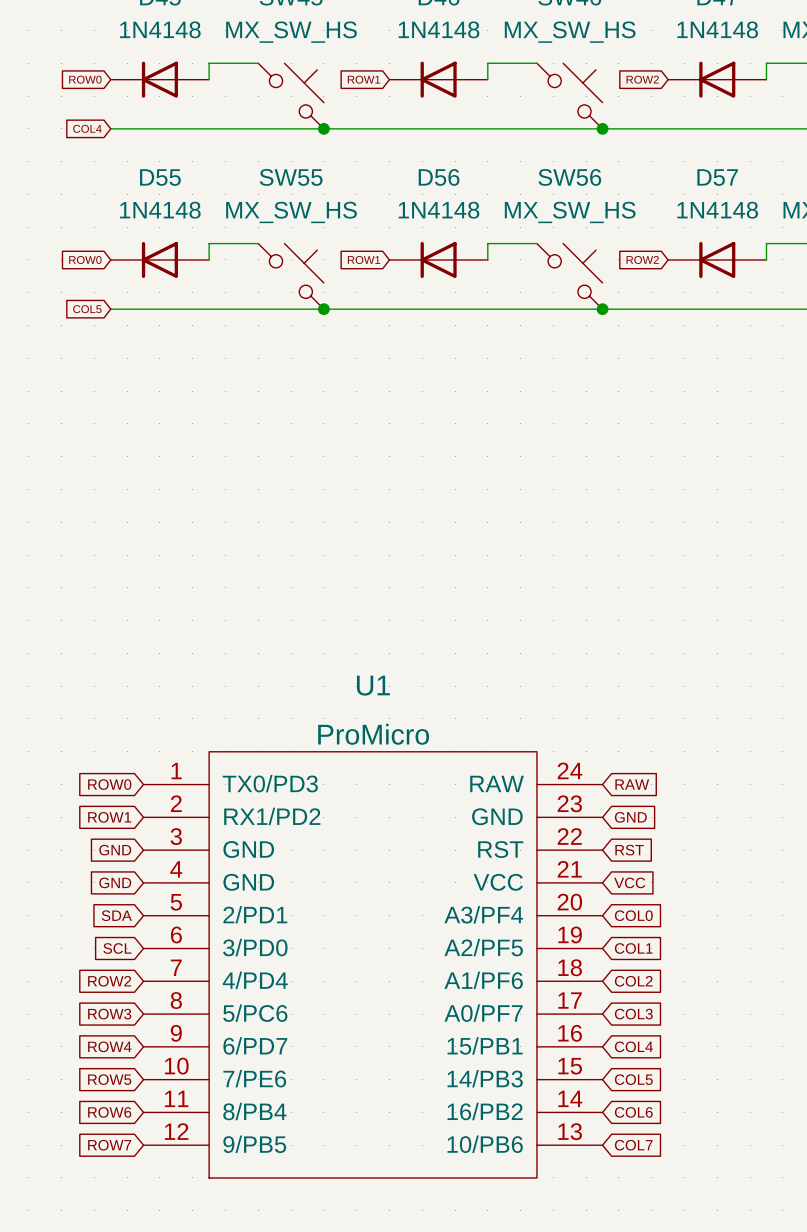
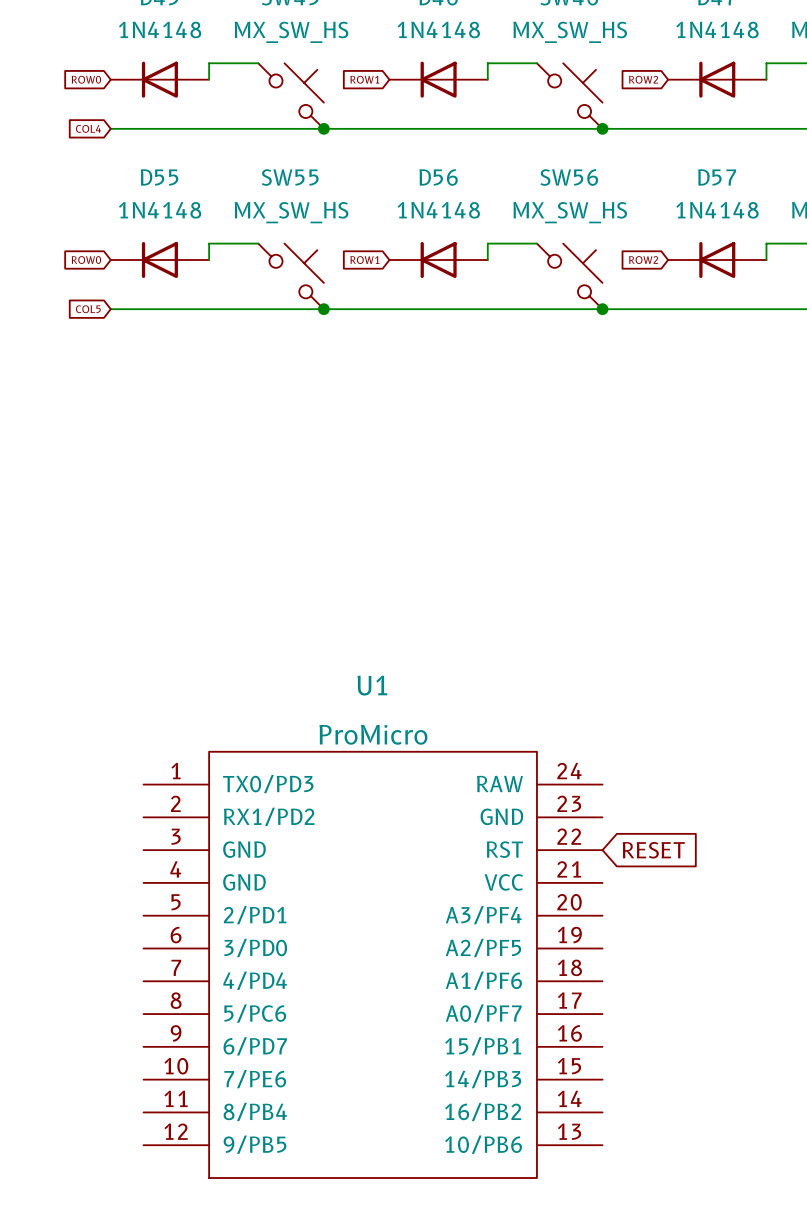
global label: ROW0 (109, 784) -> none
global label: RAW (632, 784) -> none
global label: ROW1 (109, 817) -> none
global label: GND (630, 817) -> none
global label: GND (115, 850) -> none
global label: RST (629, 850) -> RESET (653, 850)
global label: GND (115, 882) -> none
global label: VCC (629, 882) -> none
global label: SDA (116, 915) -> none
global label: COL0 (633, 915) -> none
global label: SCL (117, 948) -> none
global label: COL1 (633, 948) -> none
global label: ROW2 (109, 981) -> none
global label: COL2 (633, 981) -> none
global label: ROW3 (109, 1014) -> none
global label: COL3 (633, 1014) -> none
global label: ROW4 (109, 1046) -> none
global label: COL4 (633, 1046) -> none
global label: ROW5 (109, 1079) -> none
global label: COL5 (633, 1079) -> none
global label: ROW6 (109, 1112) -> none
global label: COL6 (633, 1112) -> none
global label: ROW7 (109, 1145) -> none
global label: COL7 (633, 1145) -> none

